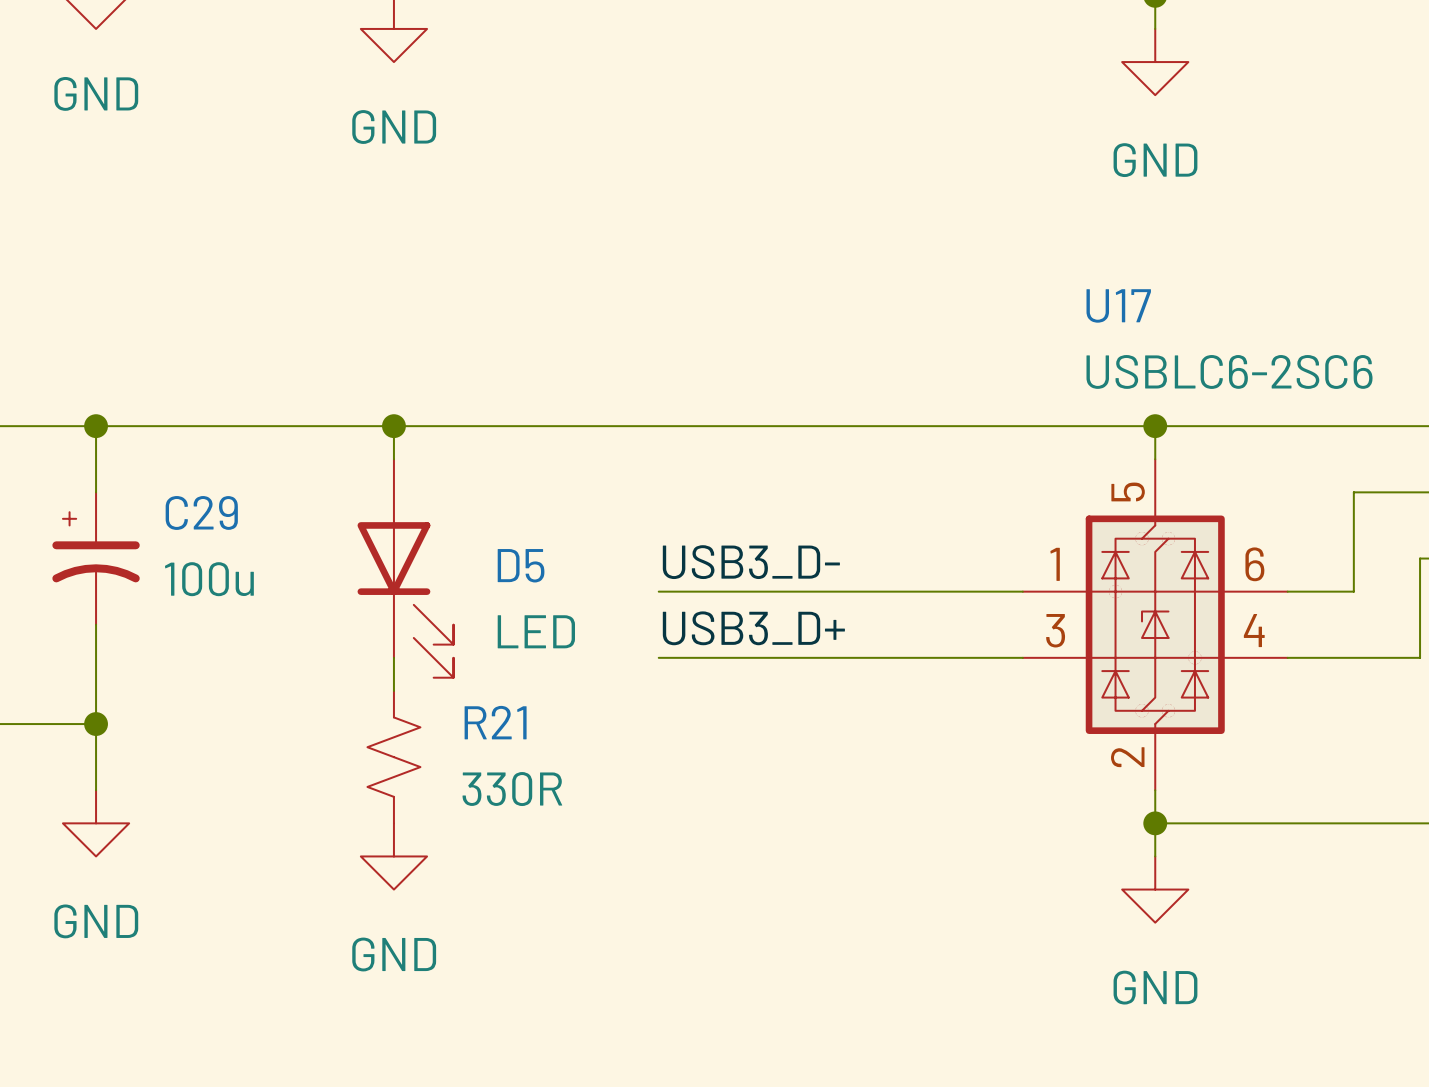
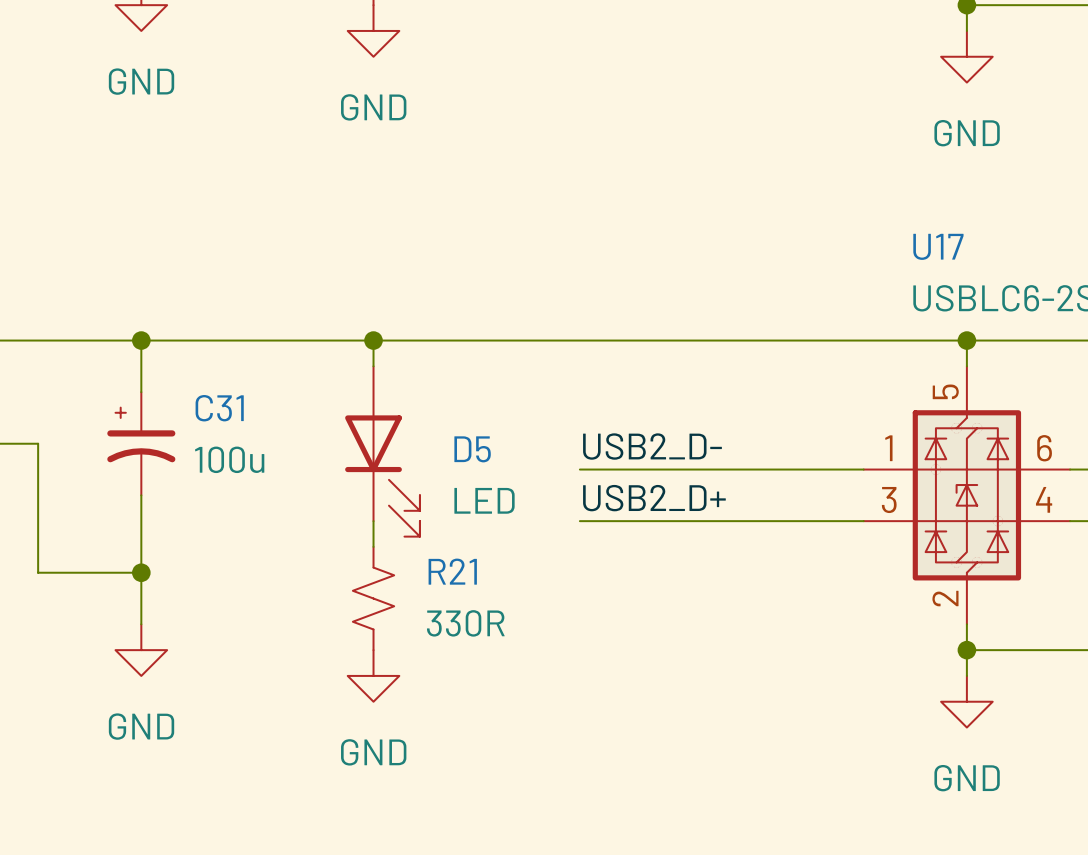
C29 name: C29 (201, 512) -> C31 (219, 408)
label: USB3_D- (751, 562) -> USB2_D- (652, 446)
label: USB3_D+ (753, 628) -> USB2_D+ (654, 498)

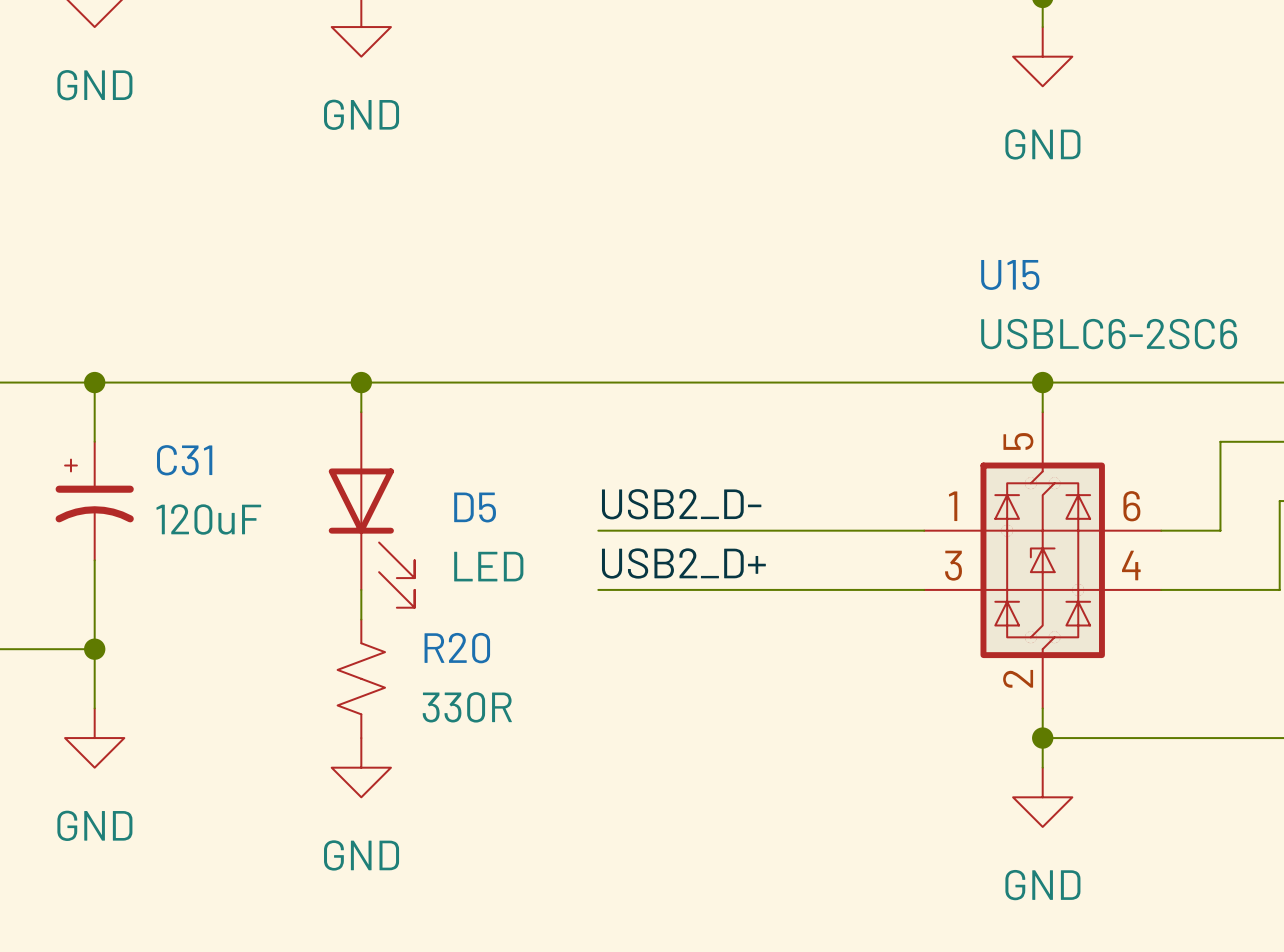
U17 name: U17 (938, 246) -> U15 (1010, 274)
C31 value: 100u (229, 459) -> 120uF (208, 519)
R21 name: R21 (452, 571) -> R20 (457, 648)

